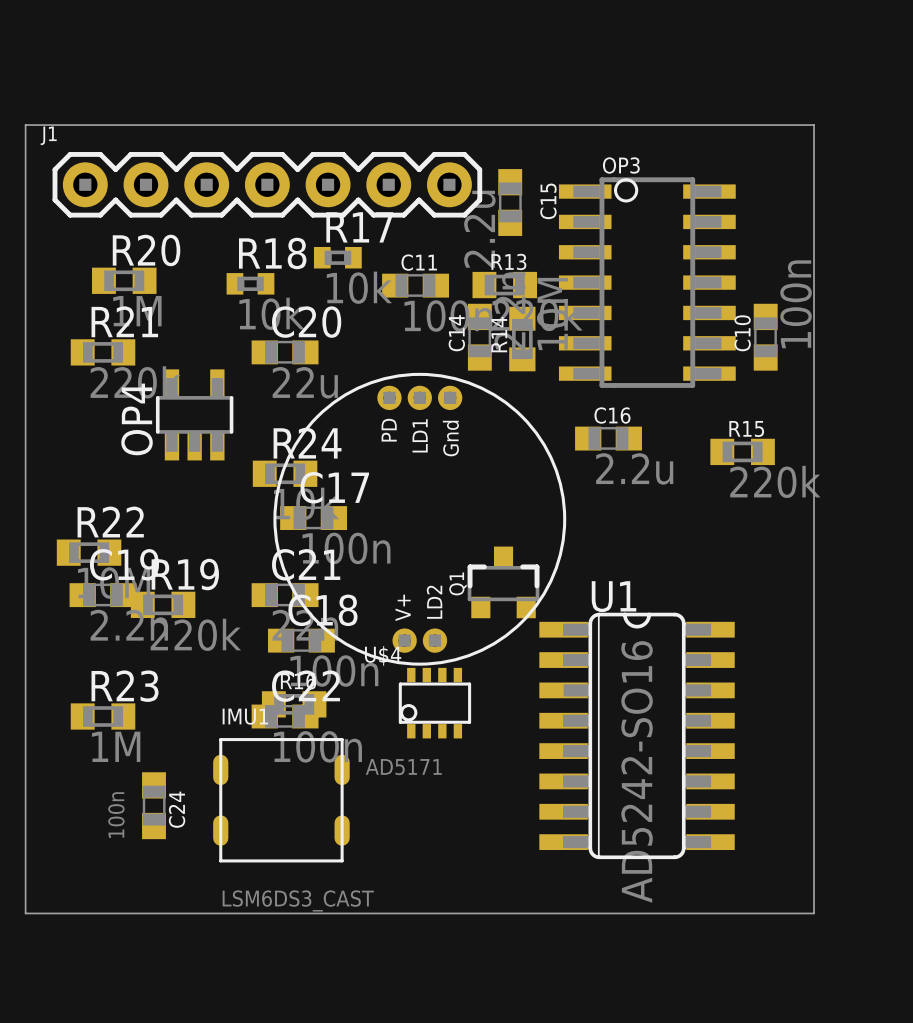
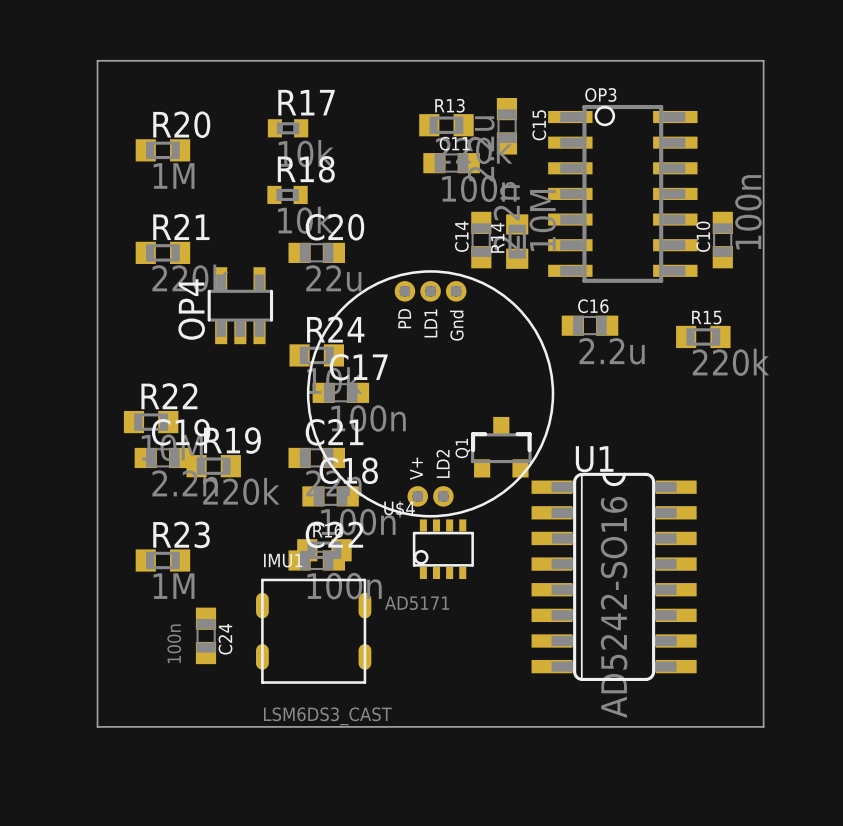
J1: (267, 184) -> none
R17 position: (337, 257) -> (288, 128)
R20 position: (124, 280) -> (162, 150)
C11 position: (415, 285) -> (451, 163)
R13 position: (504, 285) -> (446, 125)

